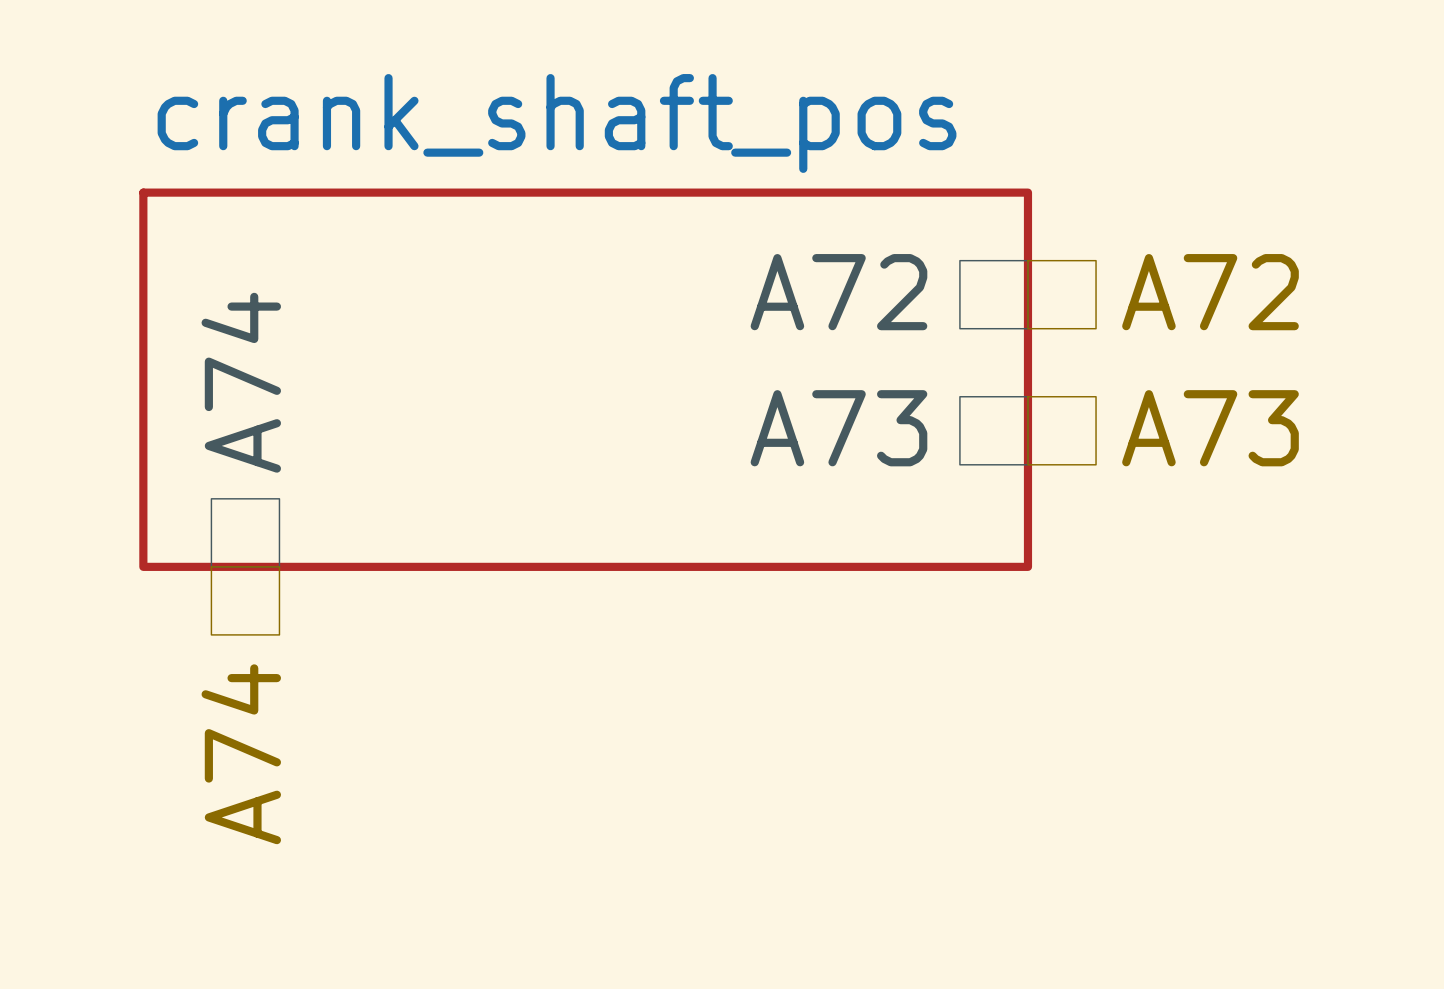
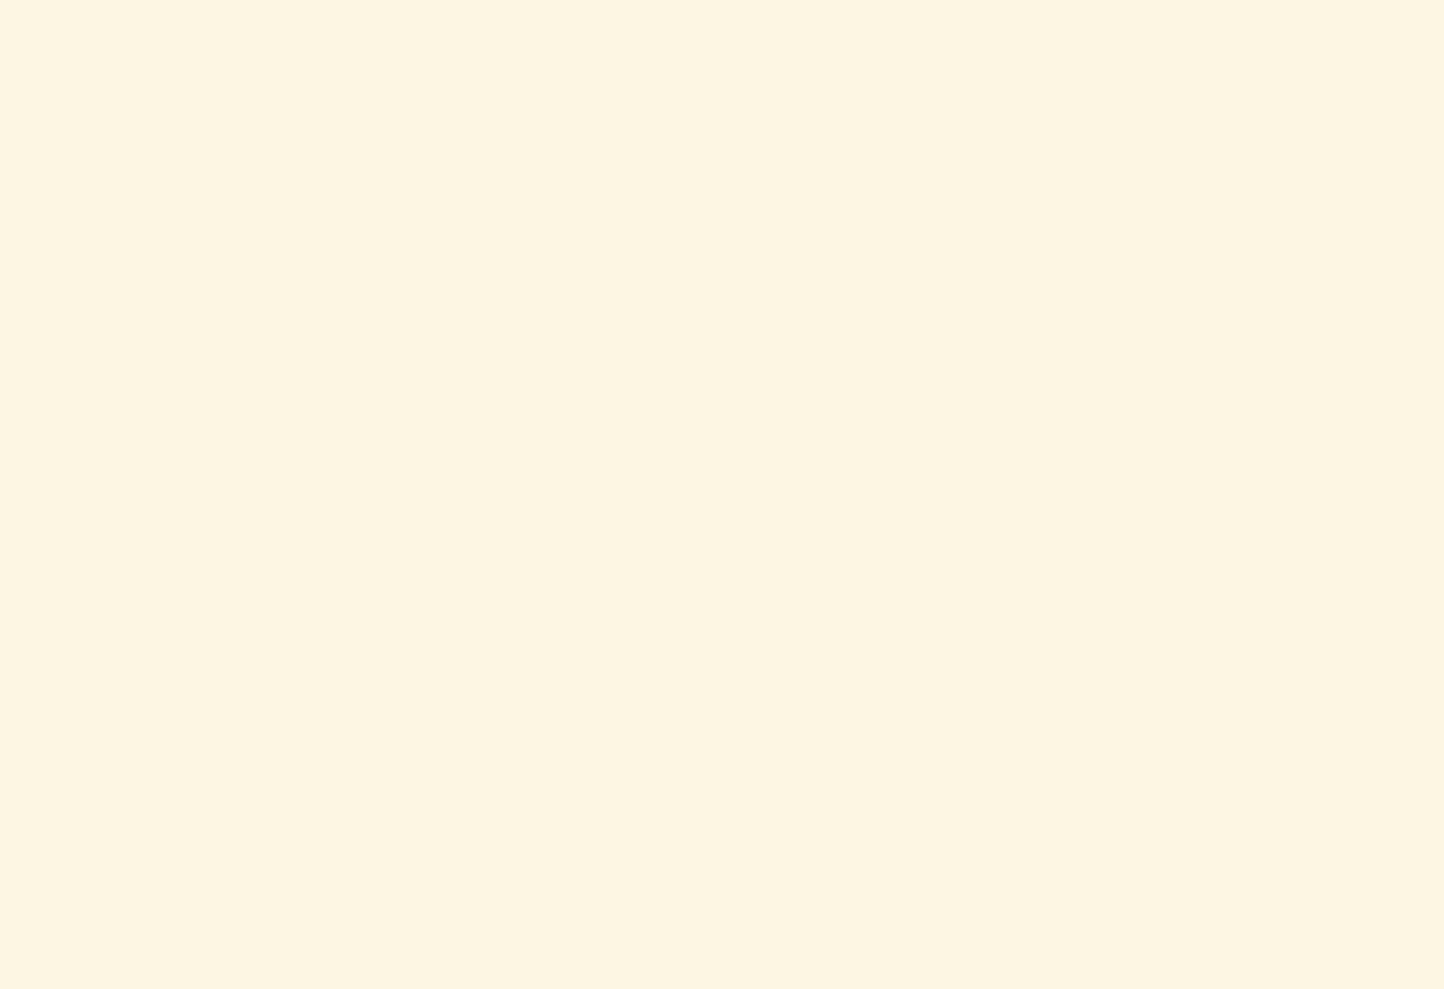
sheet pin: A72 (838, 292) -> none
hierarchical label: A72 (1210, 292) -> none
sheet crank_shaft_pos: (585, 379) -> none
sheet pin: A74 (241, 382) -> none
sheet pin: A73 (838, 428) -> none
hierarchical label: A73 (1210, 428) -> none
hierarchical label: A74 (241, 754) -> none

